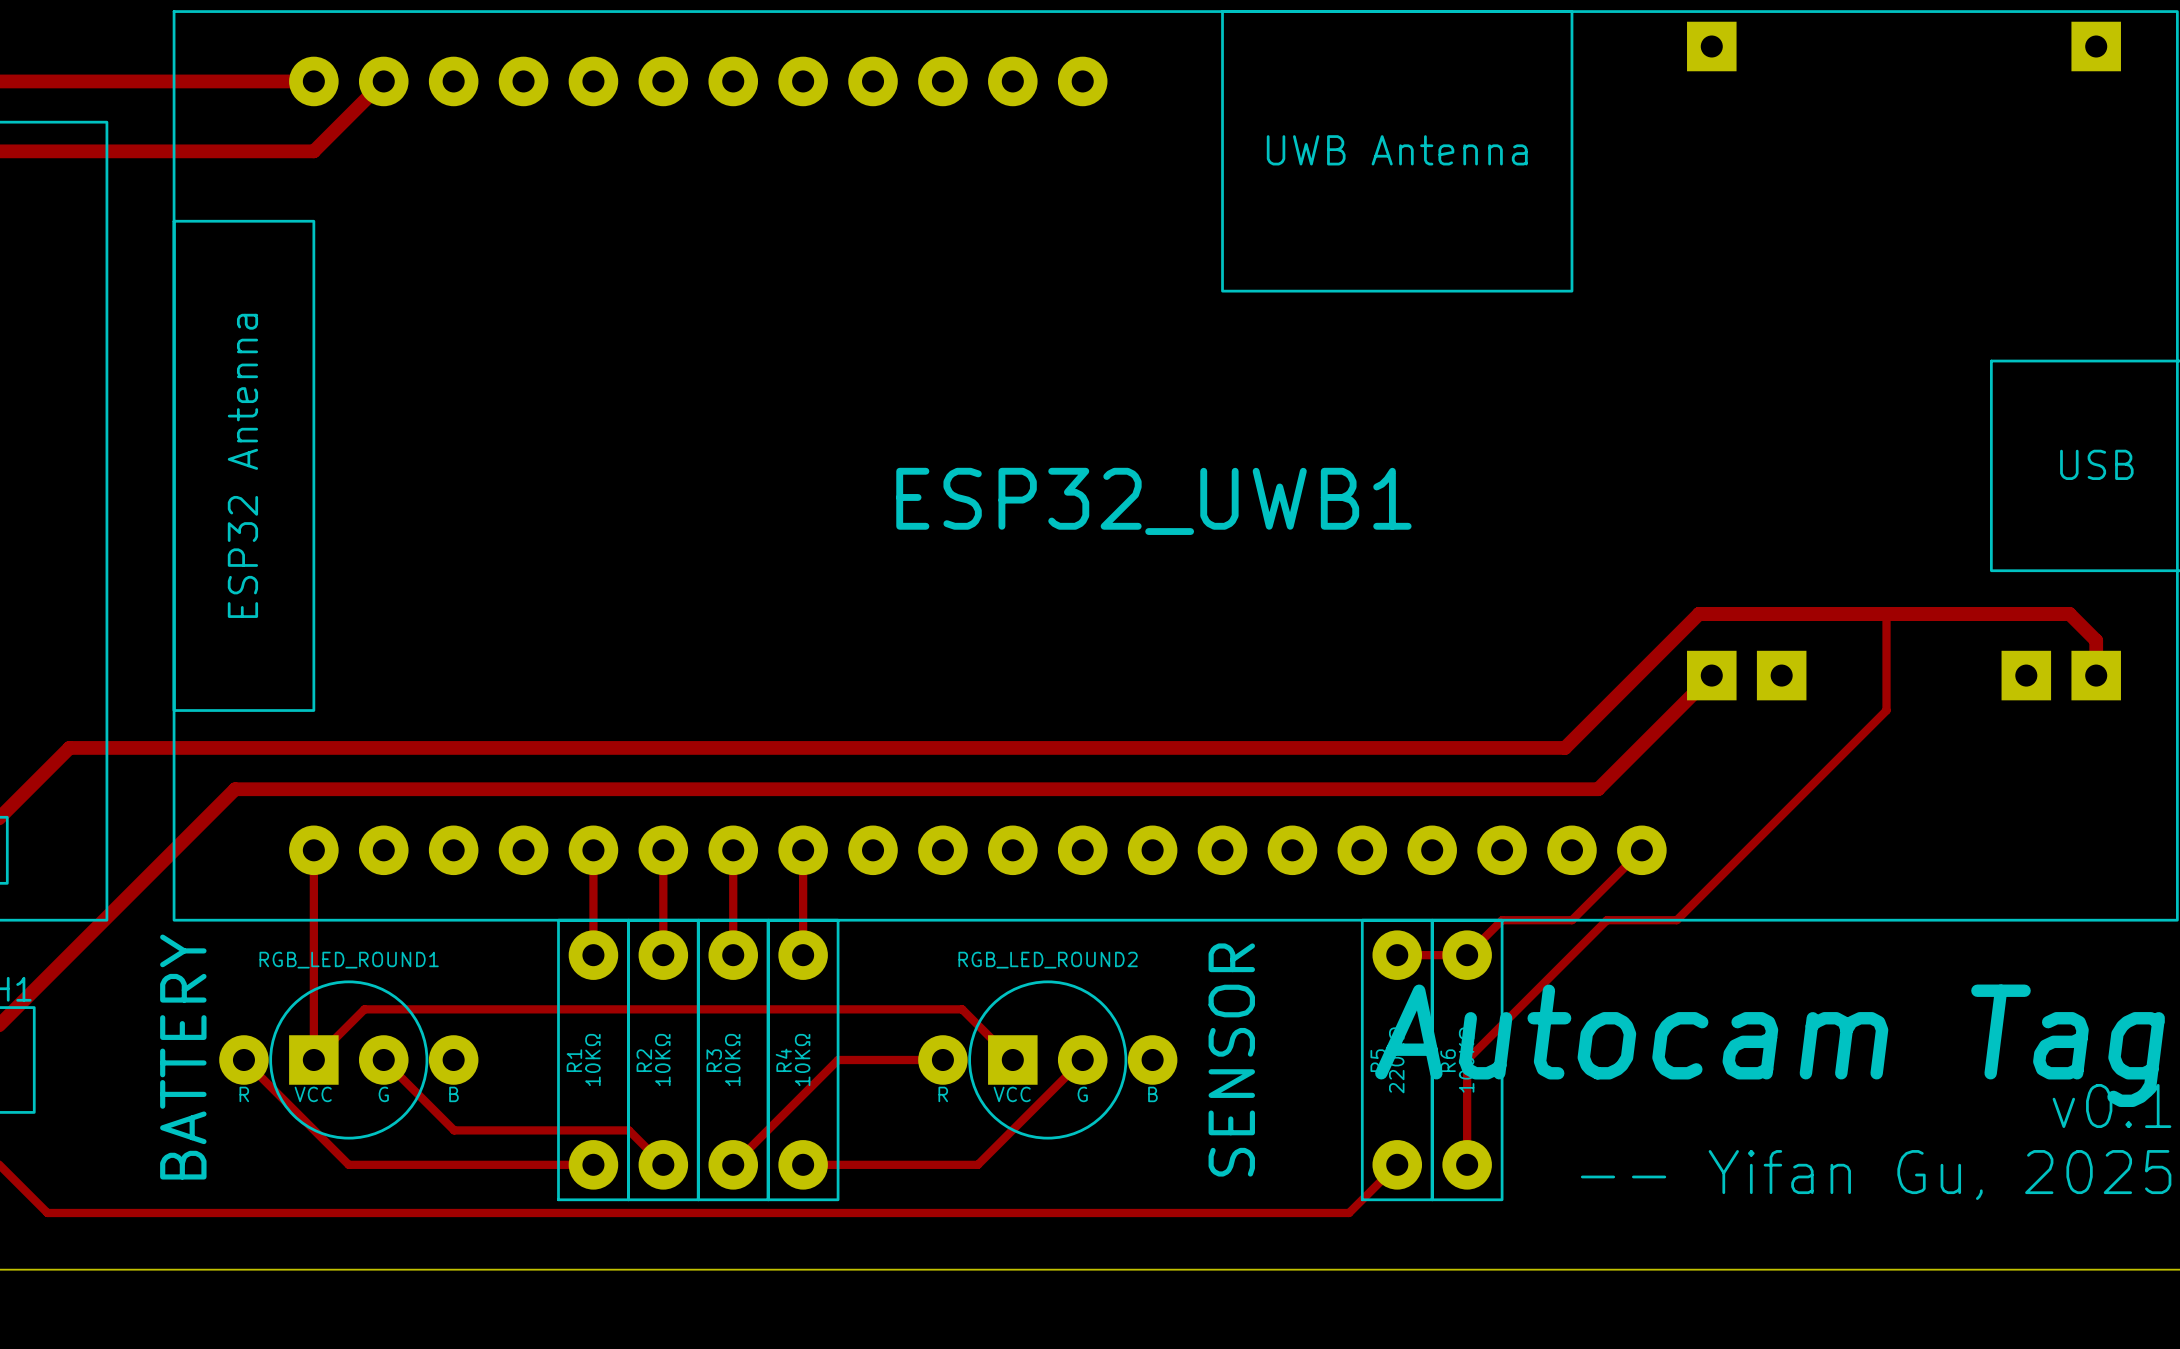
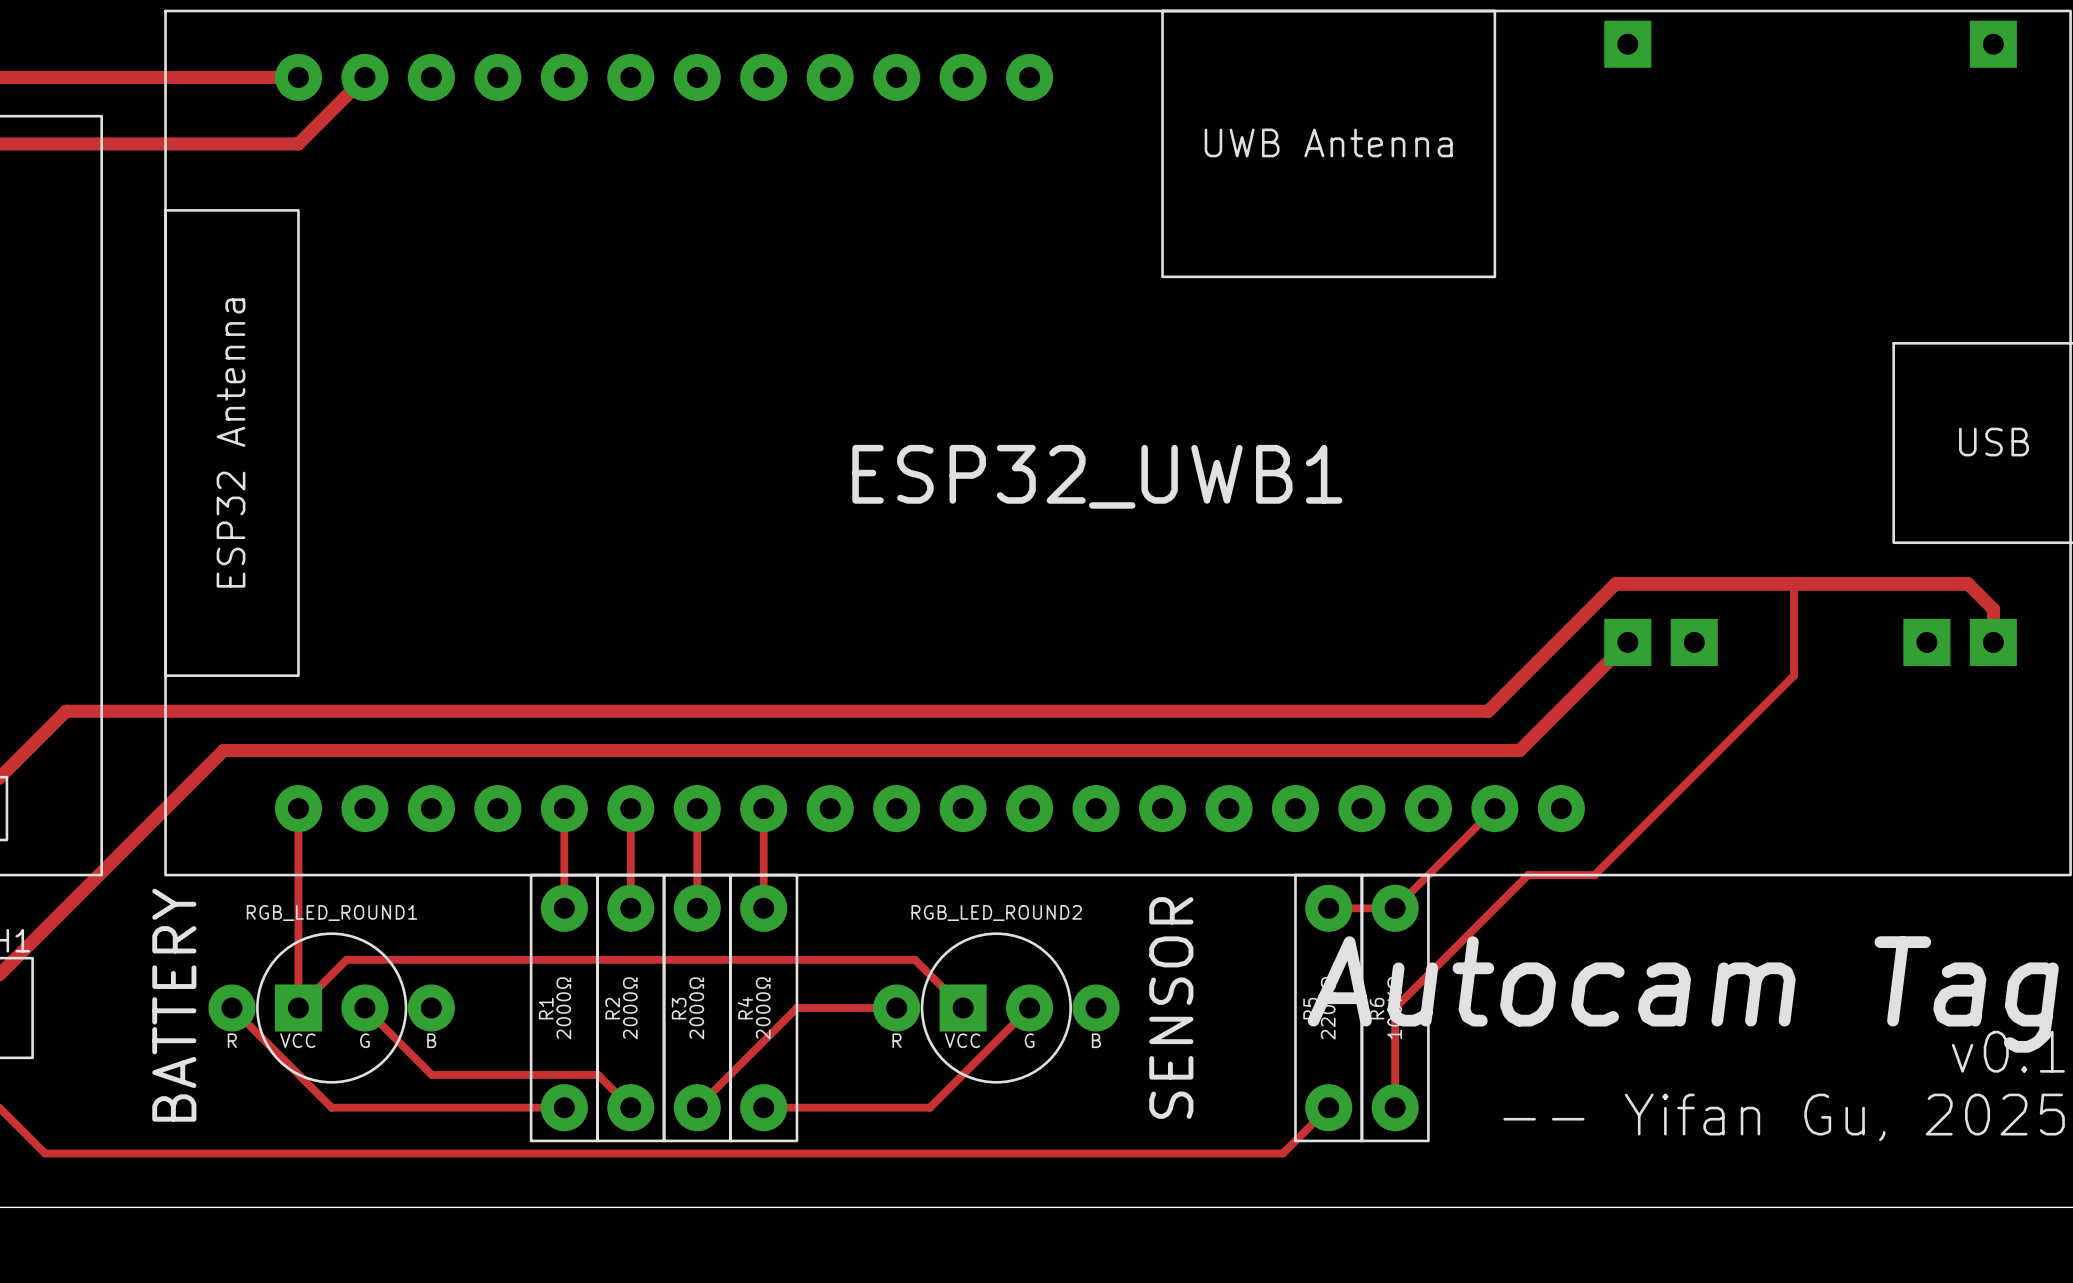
track: (1641, 850) (1571, 920) (1502, 920) -> (1494, 808) (1428, 875)
R1 value: 10KΩ (592, 1059) -> 2000Ω (563, 1008)
R2 value: 10KΩ (662, 1059) -> 2000Ω (630, 1008)
R3 value: 10KΩ (732, 1059) -> 2000Ω (696, 1008)
R4 value: 10KΩ (802, 1059) -> 2000Ω (763, 1008)

